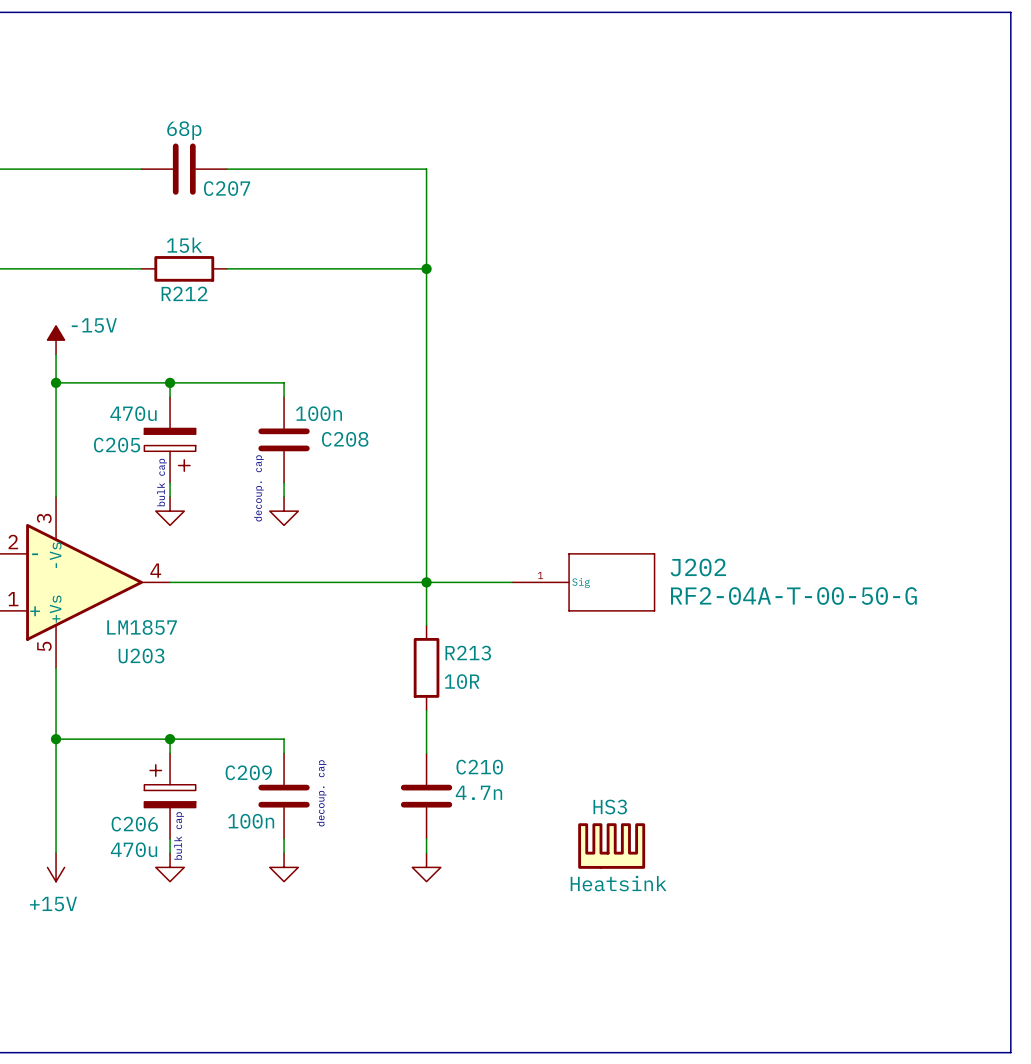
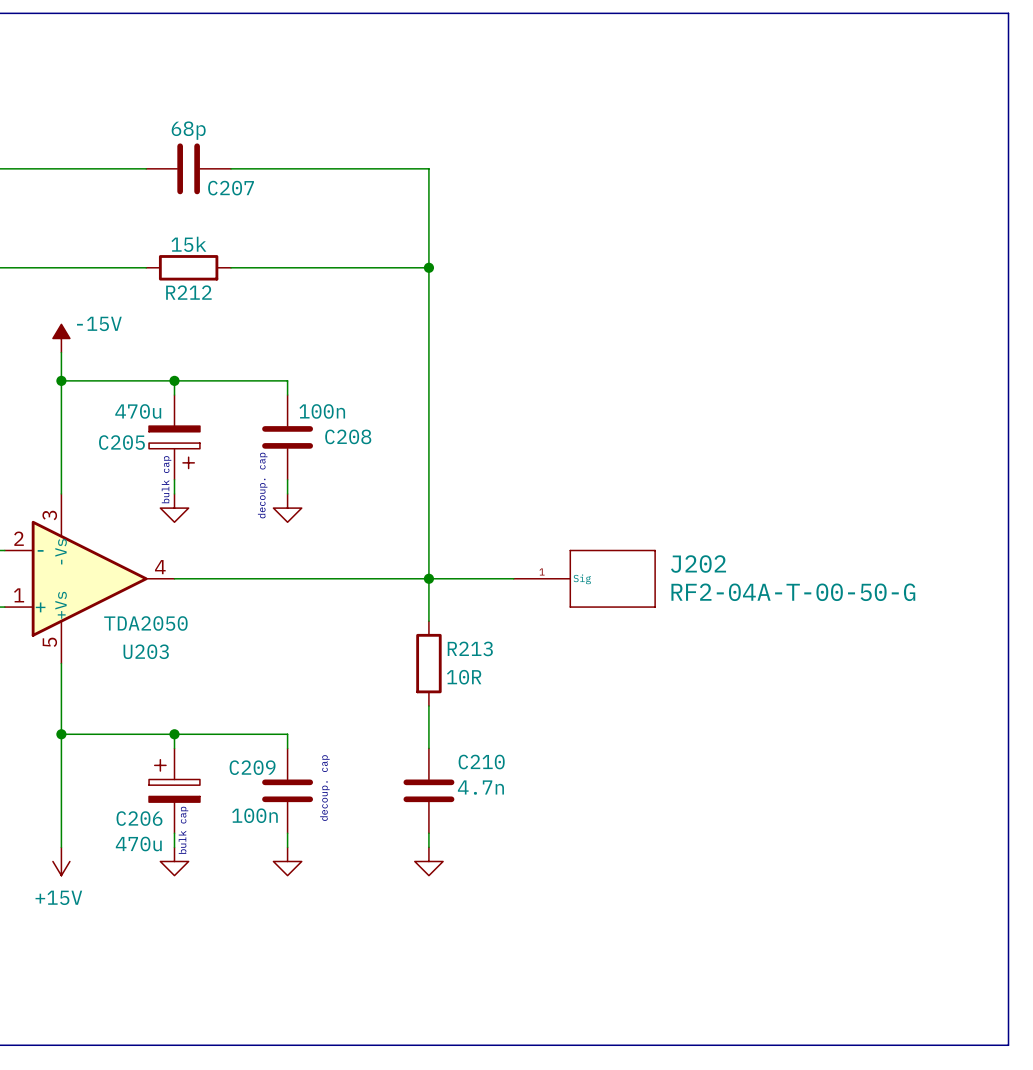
U203 value: LM1857 (142, 627) -> TDA2050 (145, 623)
HS3: Heatsink (611, 846) -> none

